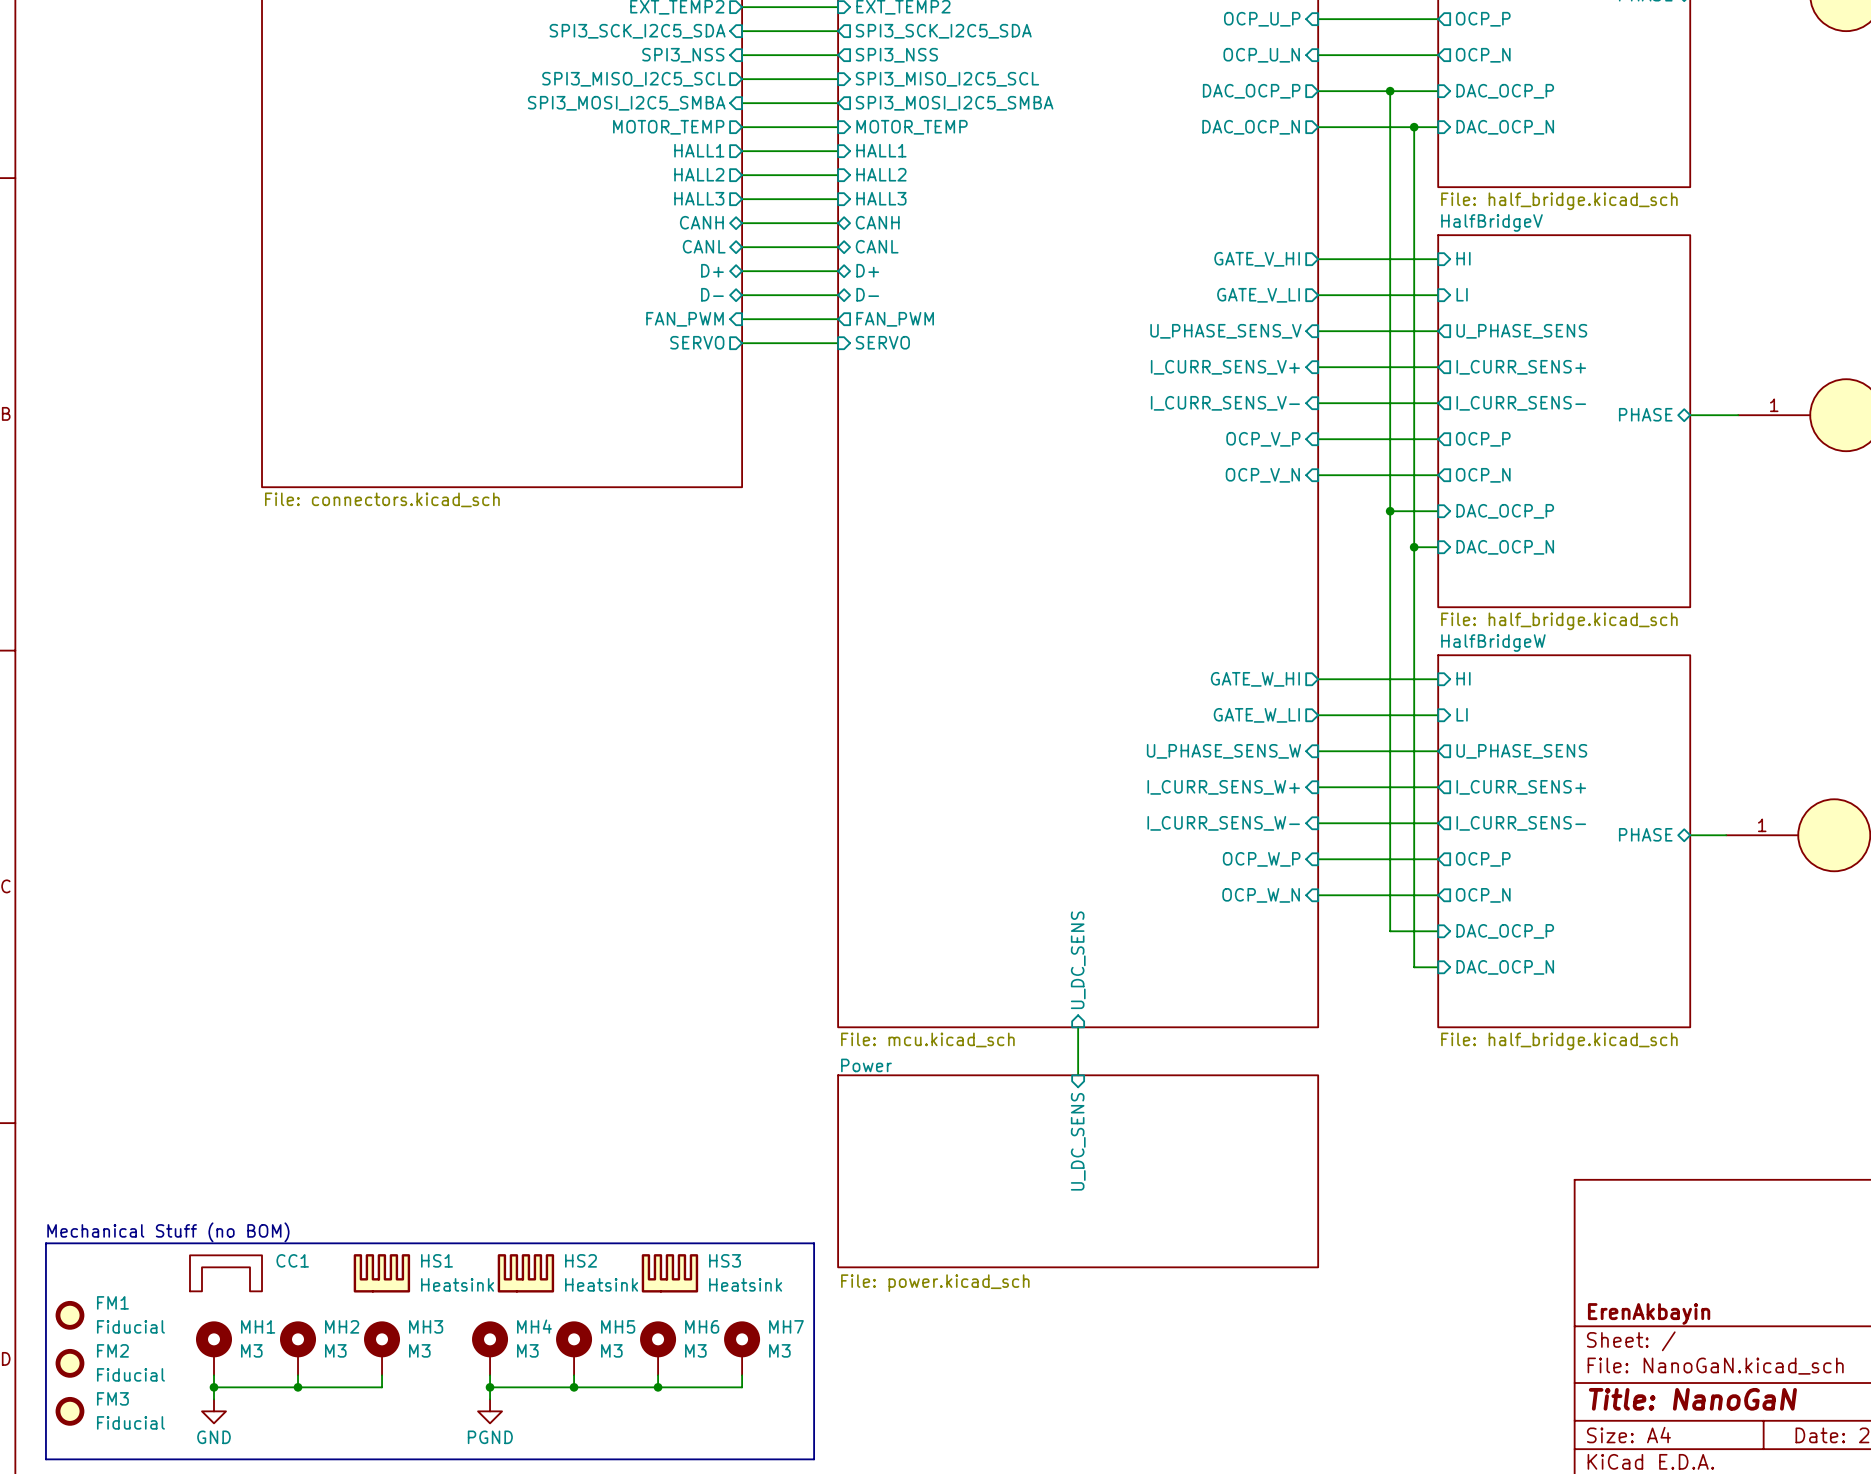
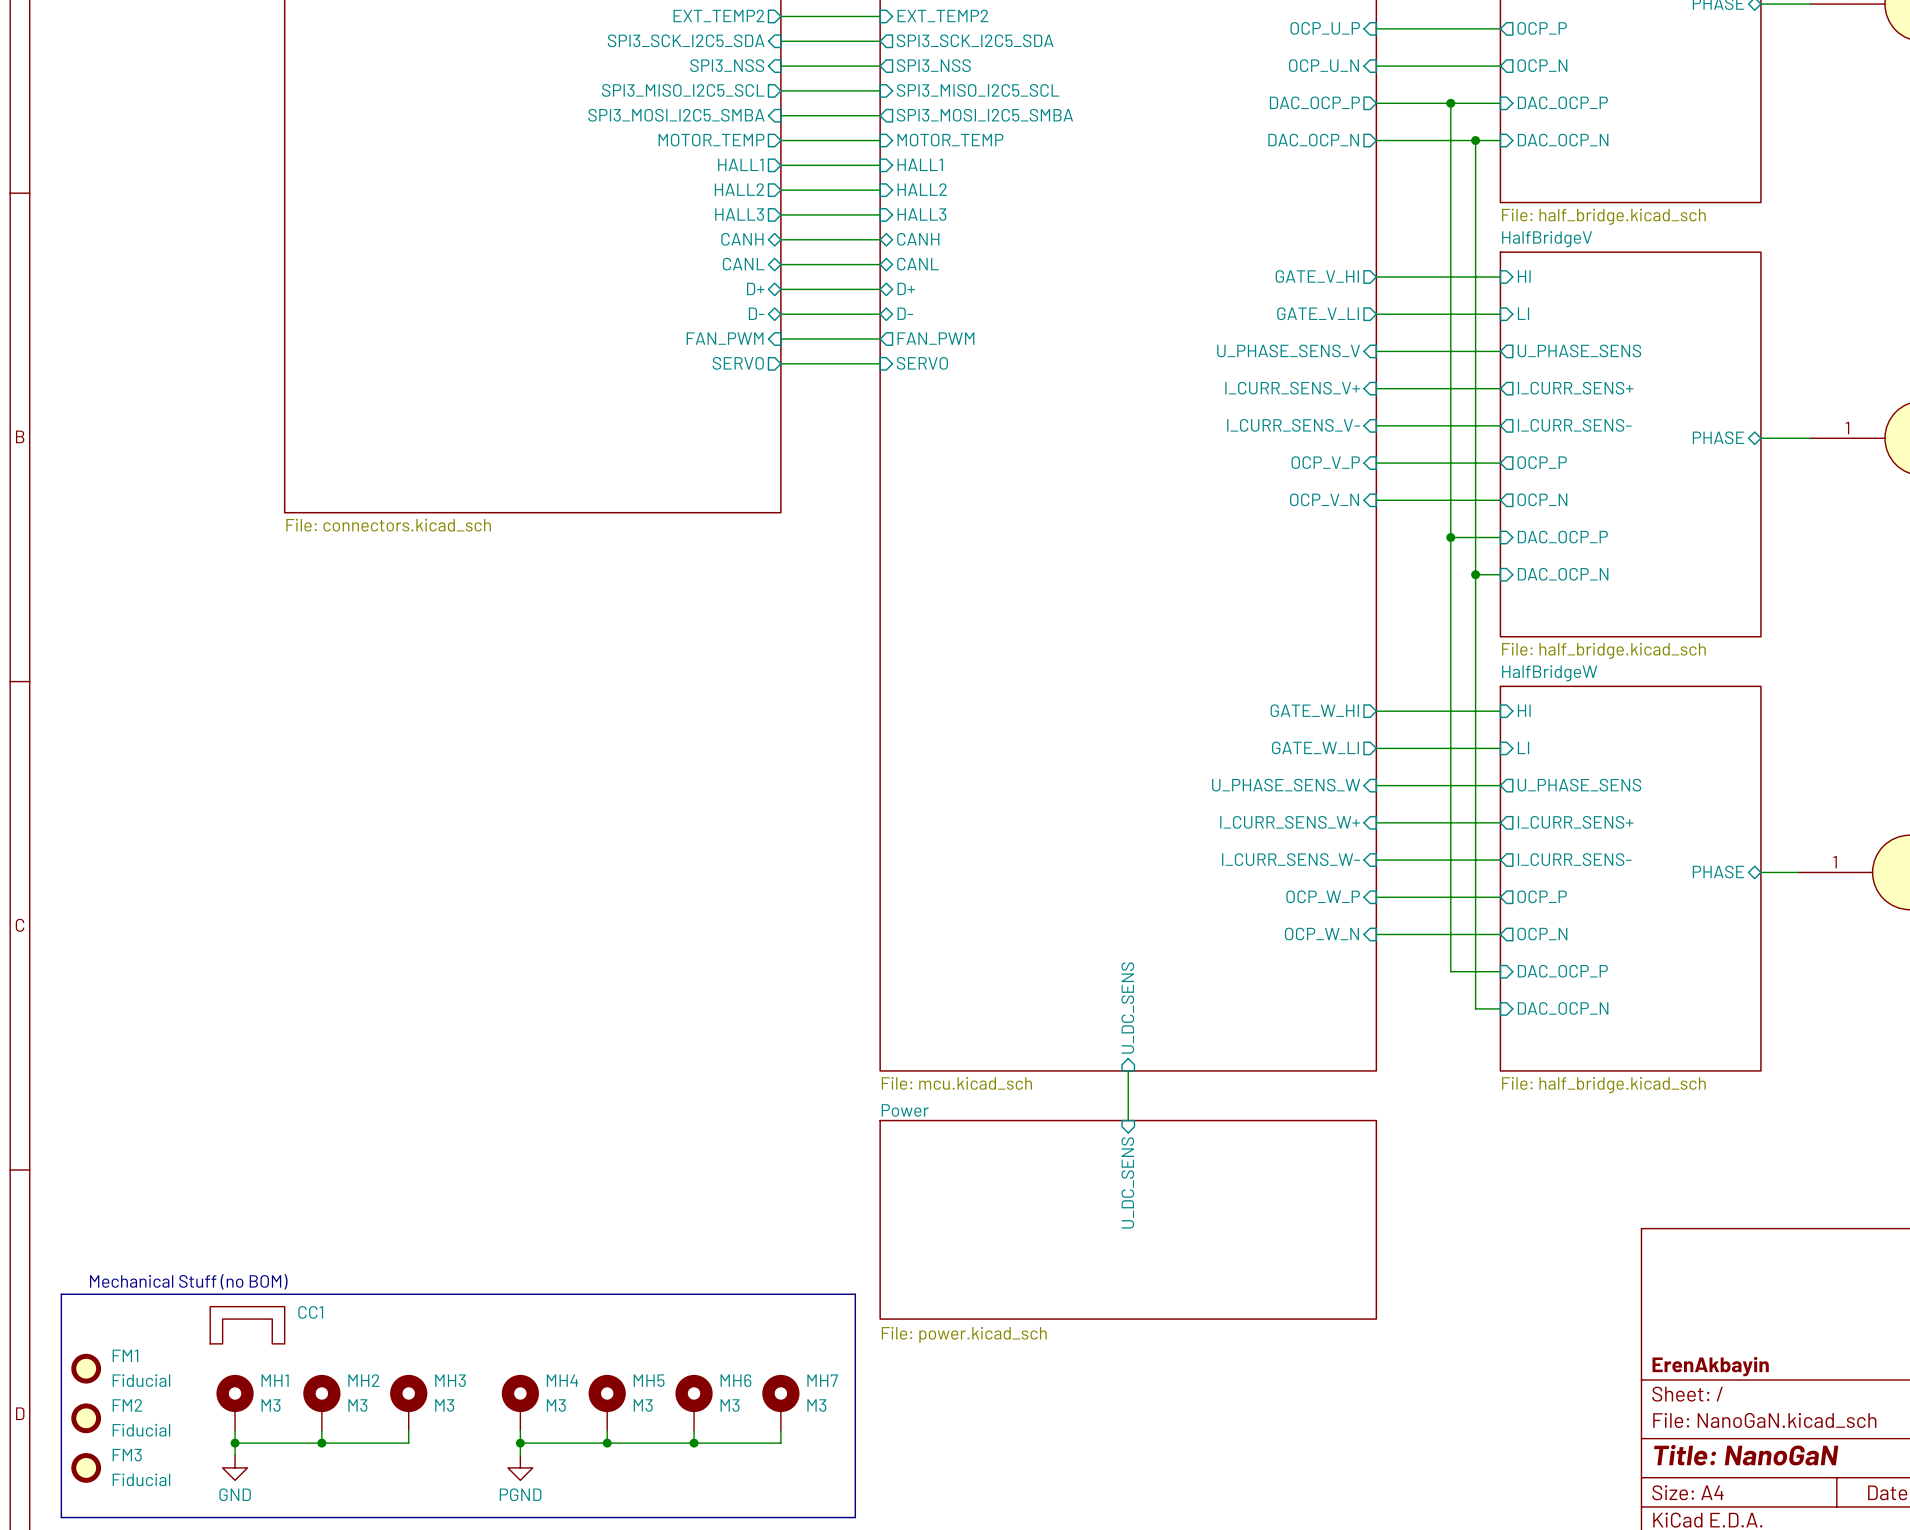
HS1: Heatsink (381, 1273) -> none
HS2: Heatsink (525, 1273) -> none
HS3: Heatsink (669, 1273) -> none

